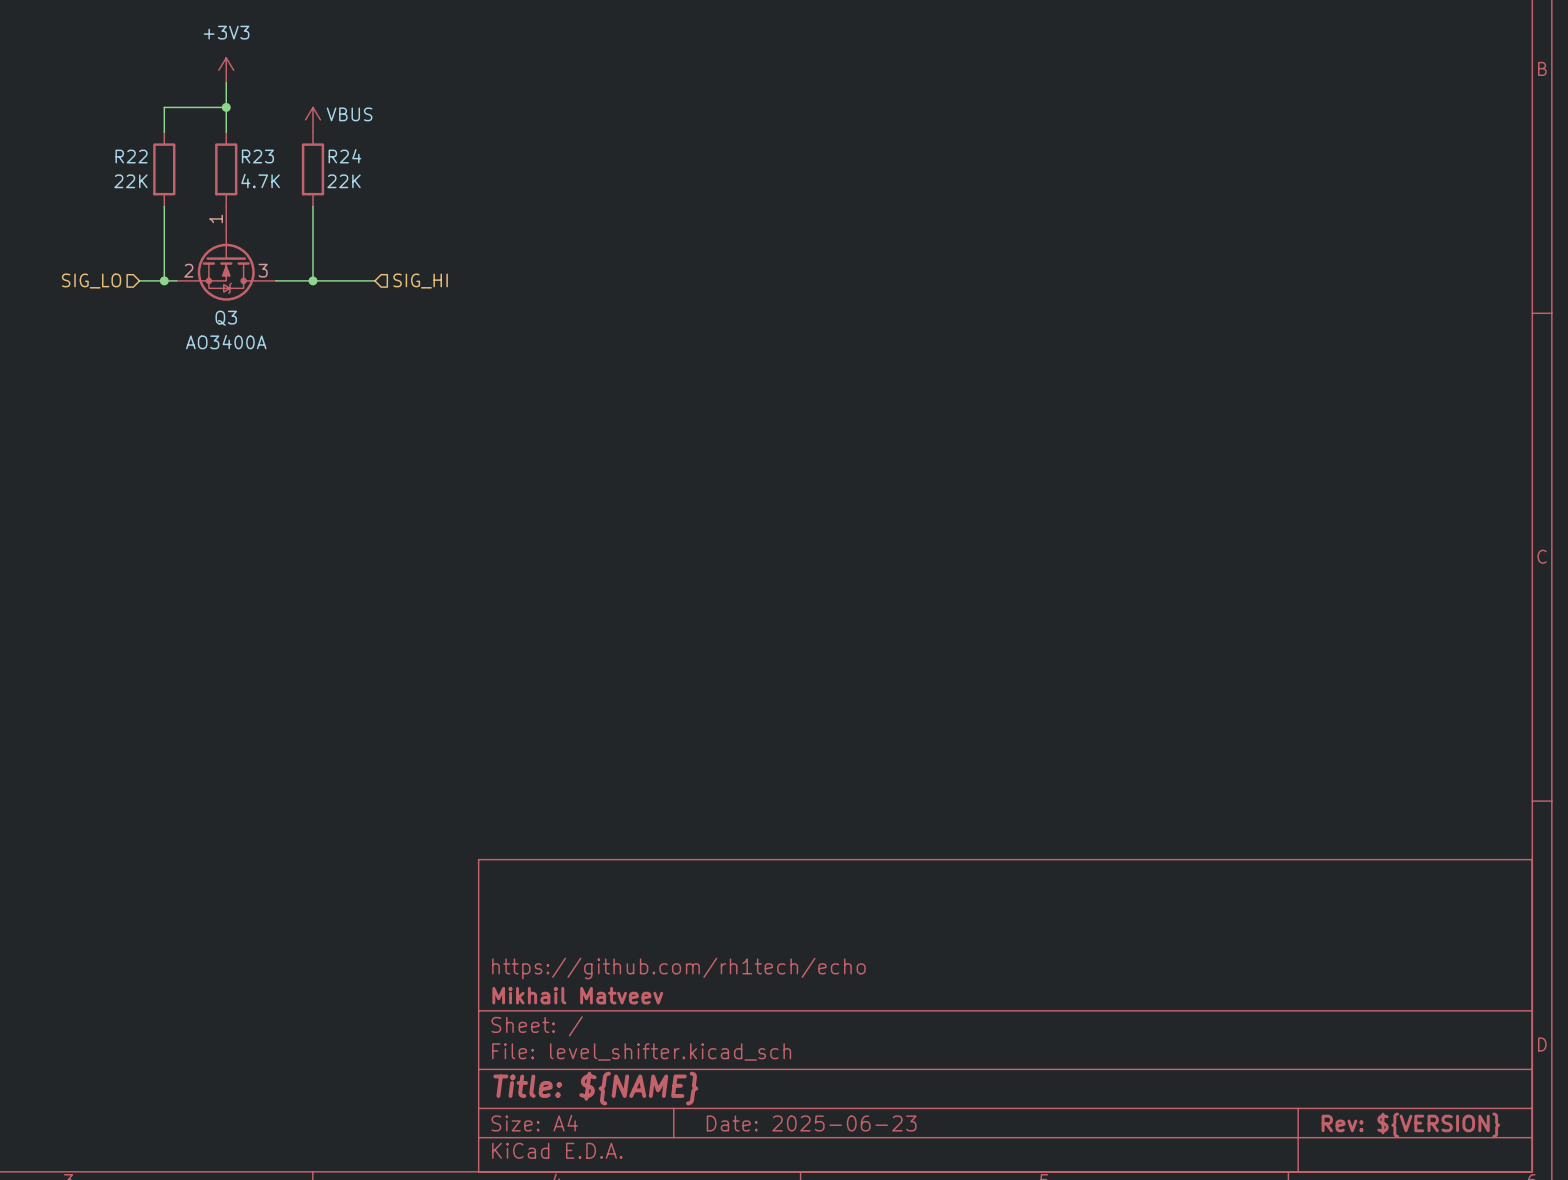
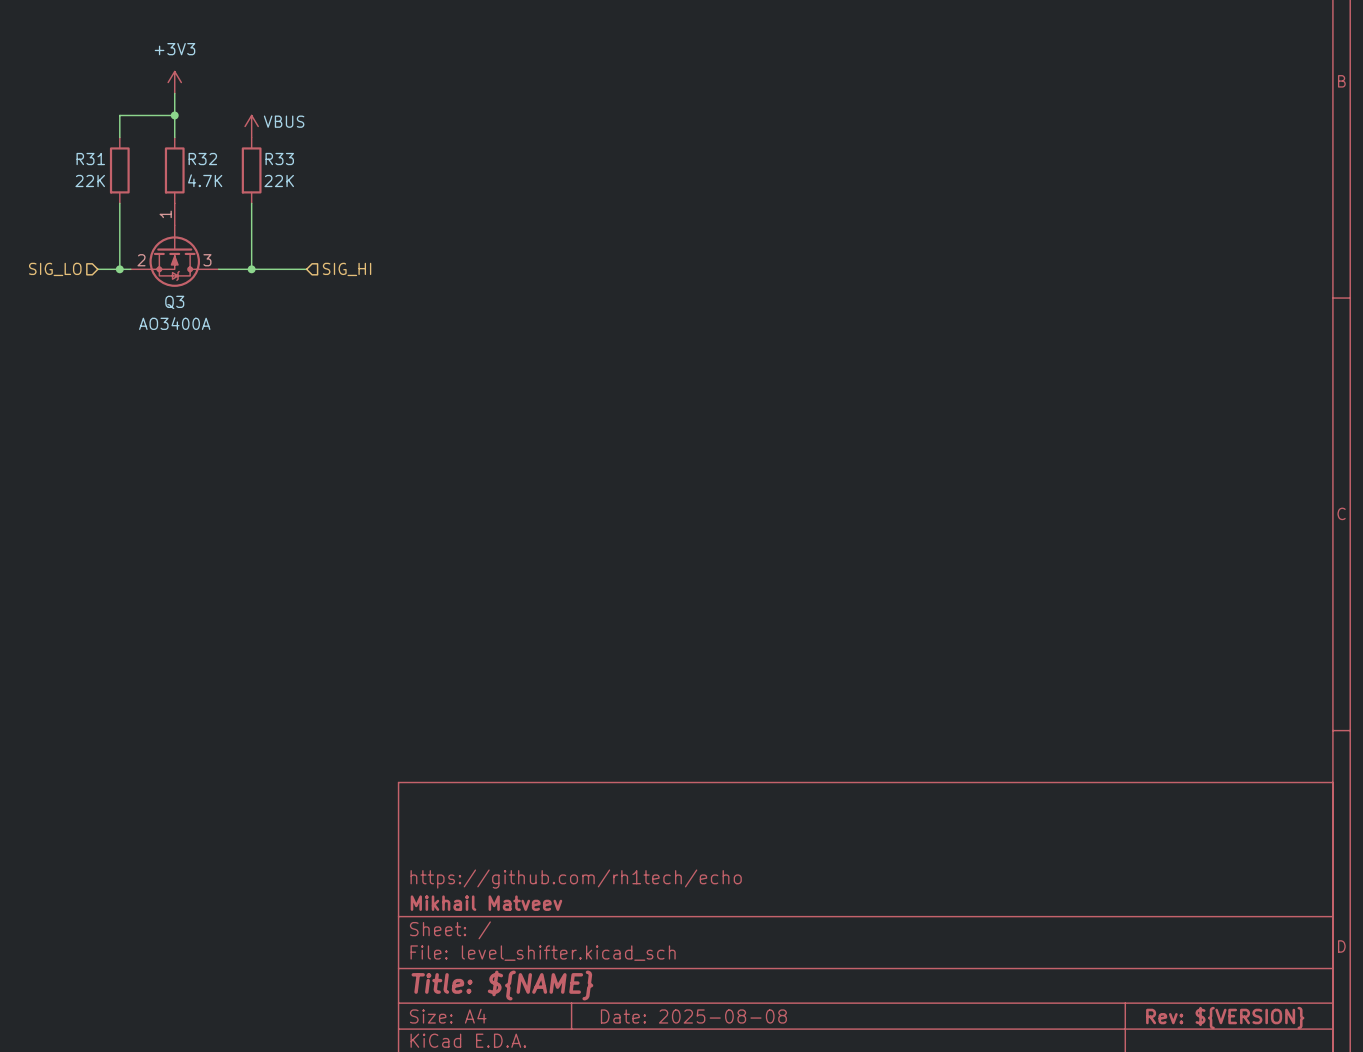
R22 name: R22 (131, 156) -> R31 (90, 159)
R23 name: R23 (257, 156) -> R32 (202, 159)
R24 name: R24 (344, 156) -> R33 (279, 159)
title block: Date: 2025-06-23 (811, 1123) -> Date: 2025-08-08 (693, 1016)

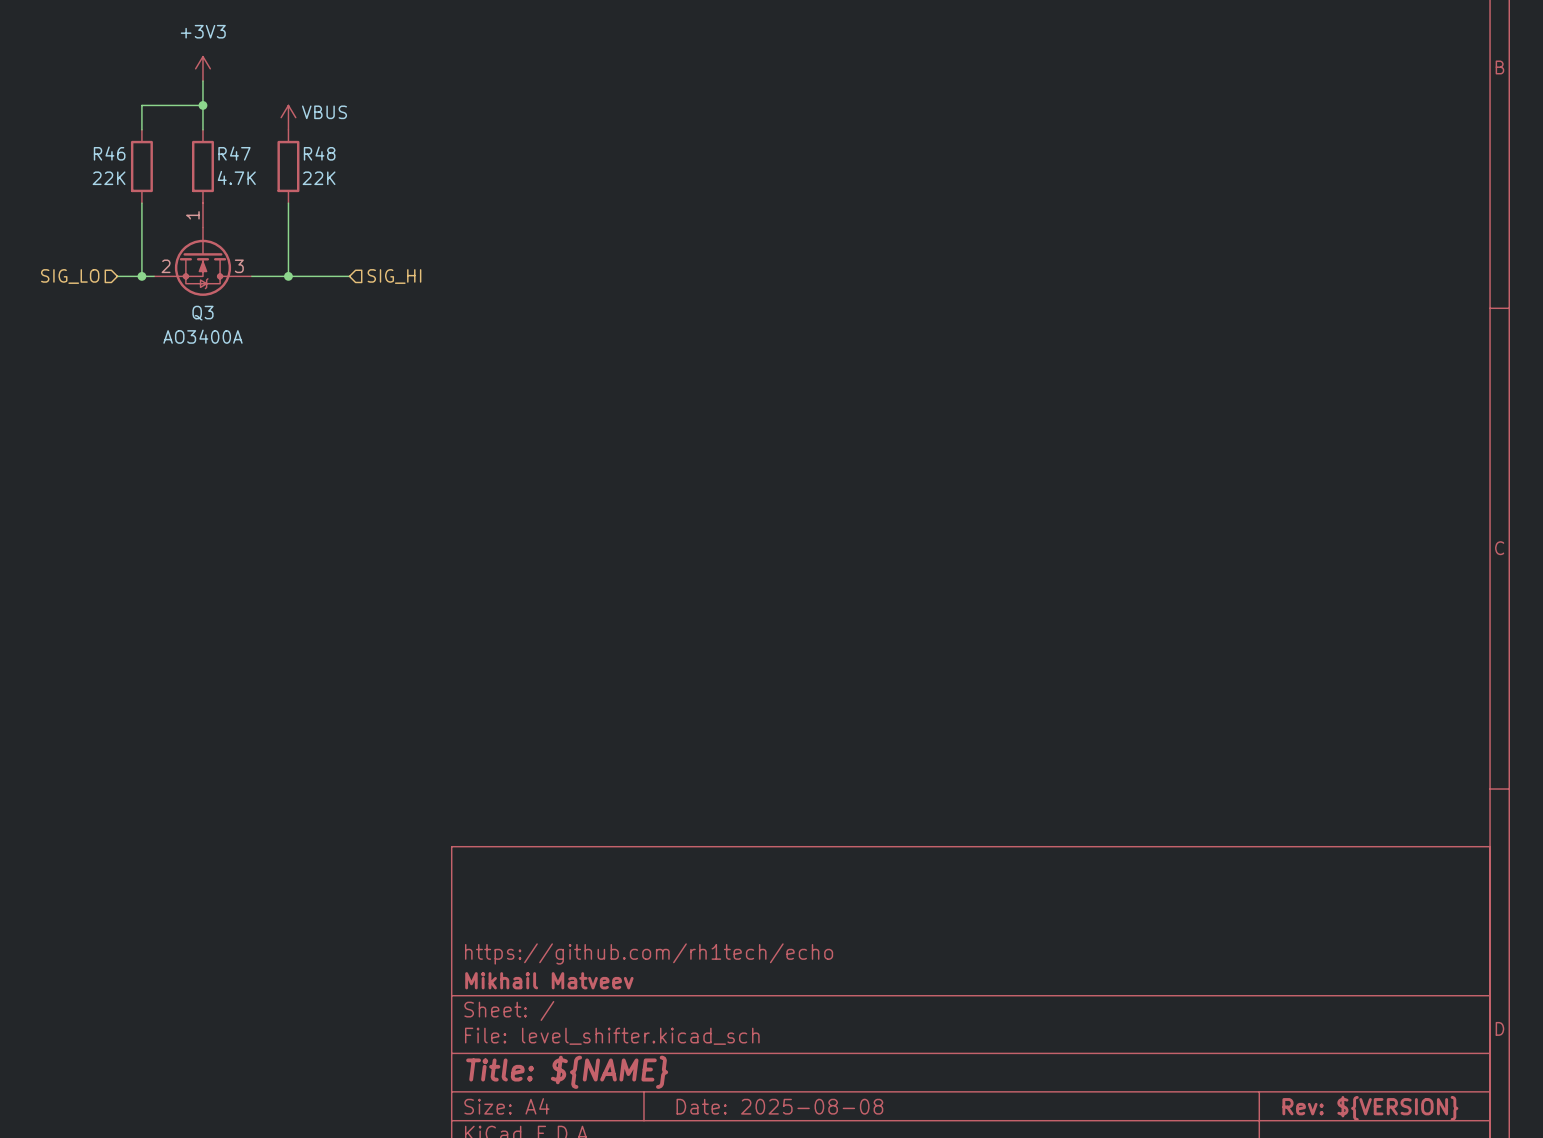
R31 name: R31 (90, 159) -> R46 (109, 153)
R32 name: R32 (202, 159) -> R47 (234, 153)
R33 name: R33 (279, 159) -> R48 (319, 153)

